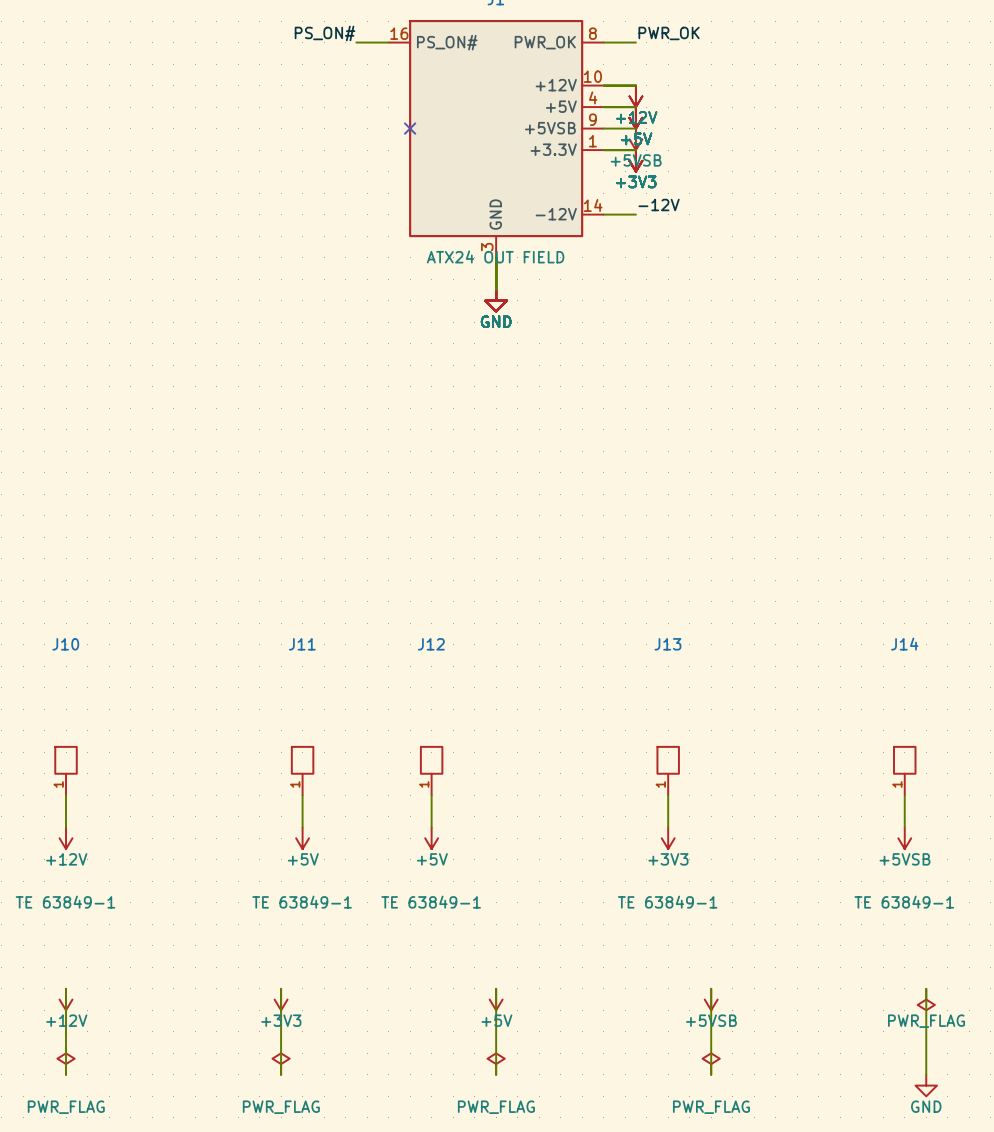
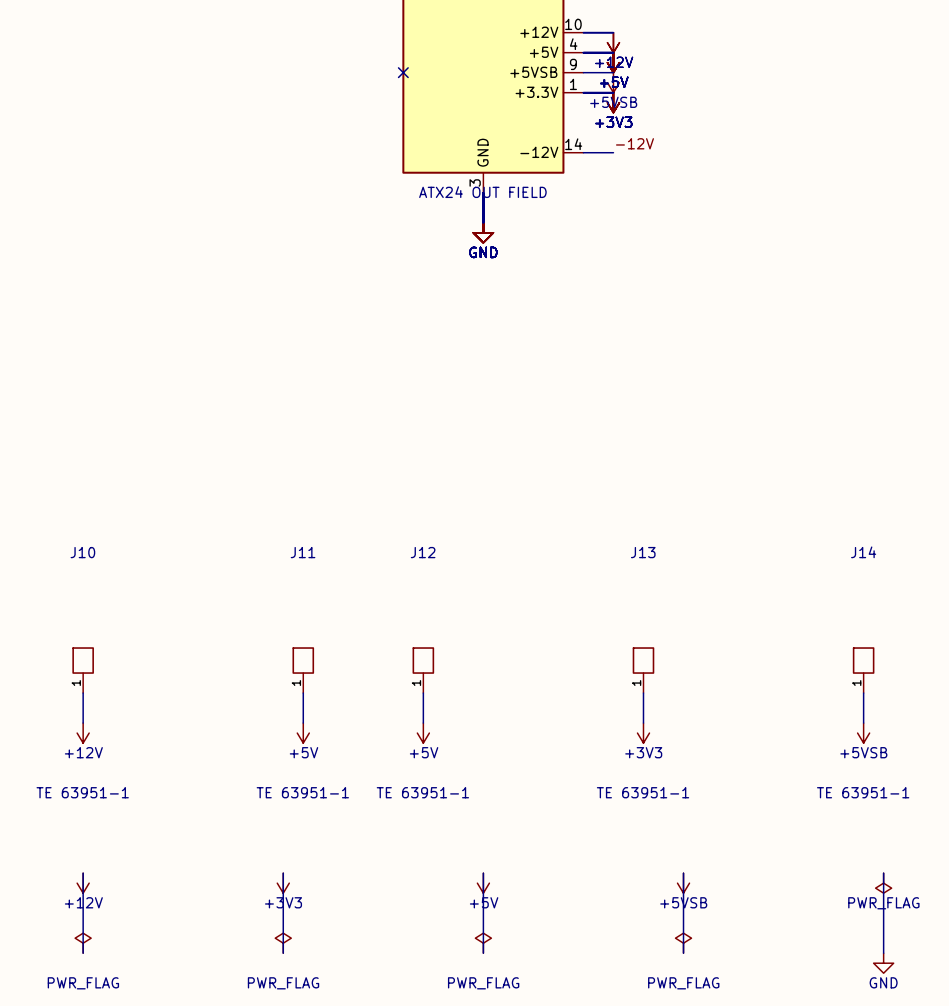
J10 value: TE 63849-1 (65, 902) -> TE 63951-1 (82, 792)
J11 value: TE 63849-1 (302, 902) -> TE 63951-1 (302, 792)
J12 value: TE 63849-1 (431, 902) -> TE 63951-1 (422, 792)
J13 value: TE 63849-1 (667, 902) -> TE 63951-1 (643, 792)
J14 value: TE 63849-1 (904, 902) -> TE 63951-1 (863, 792)

